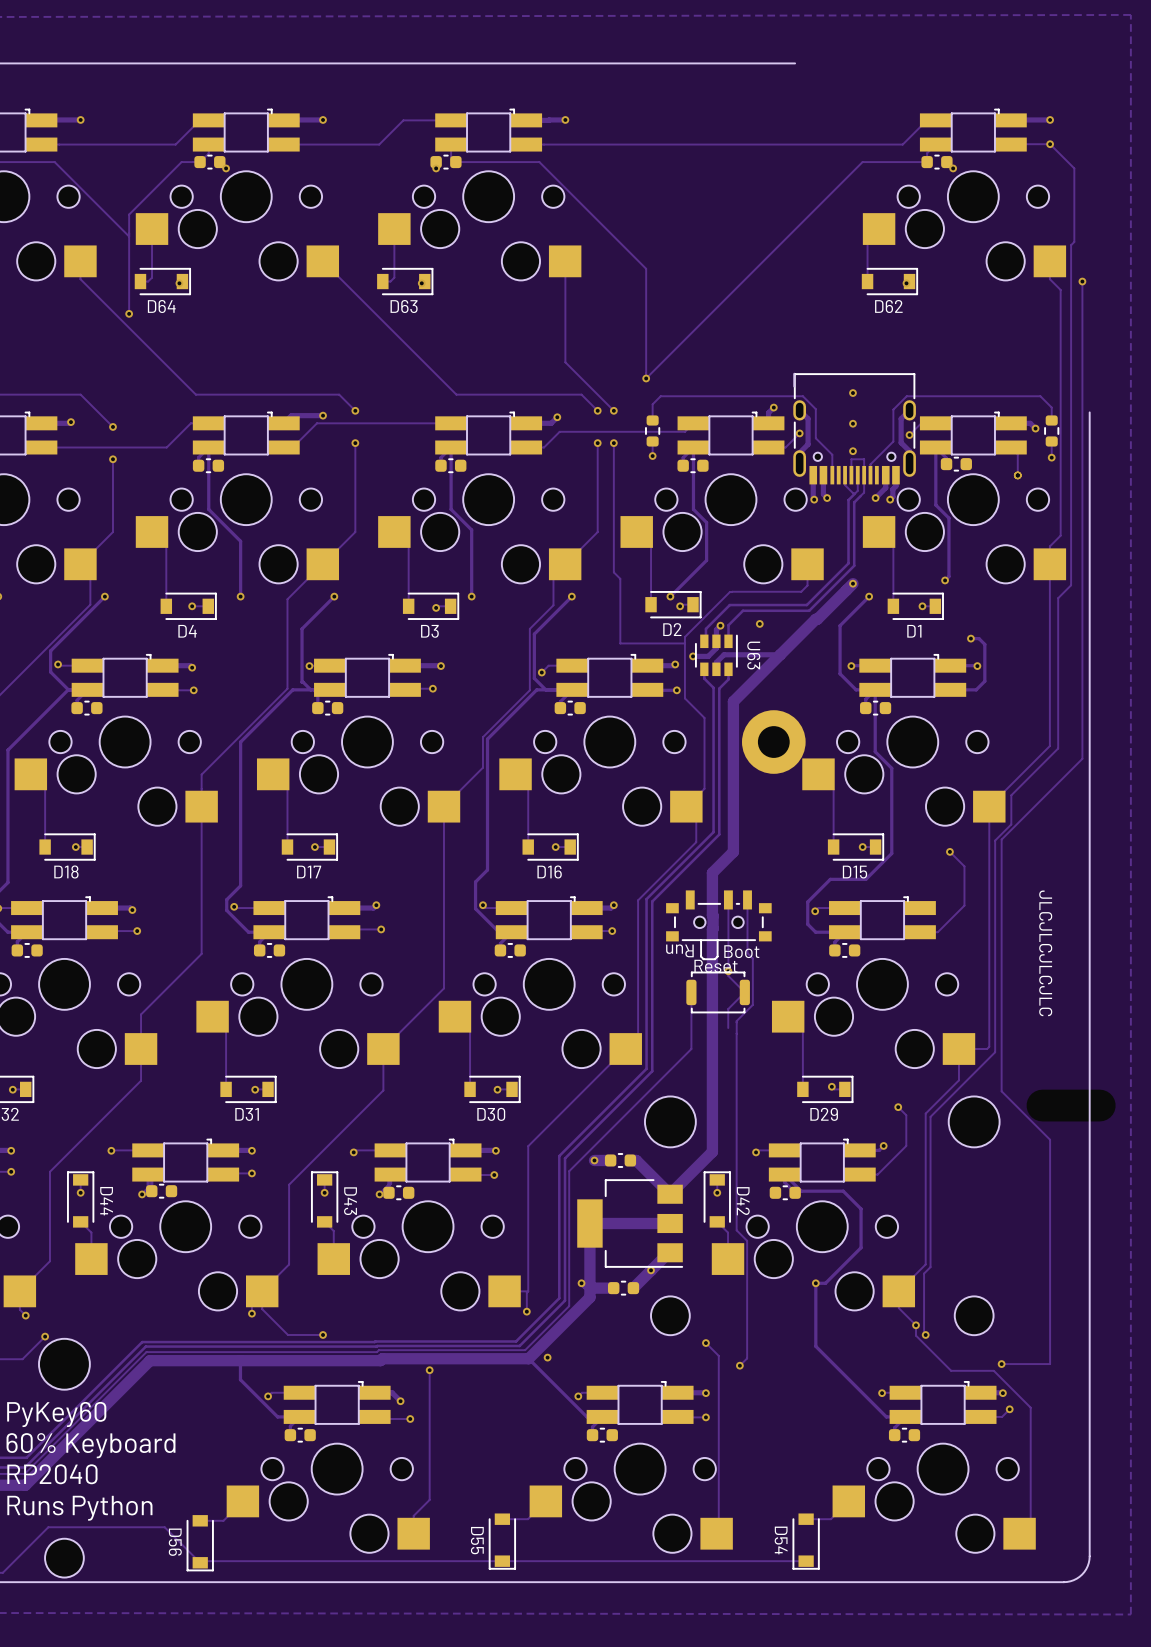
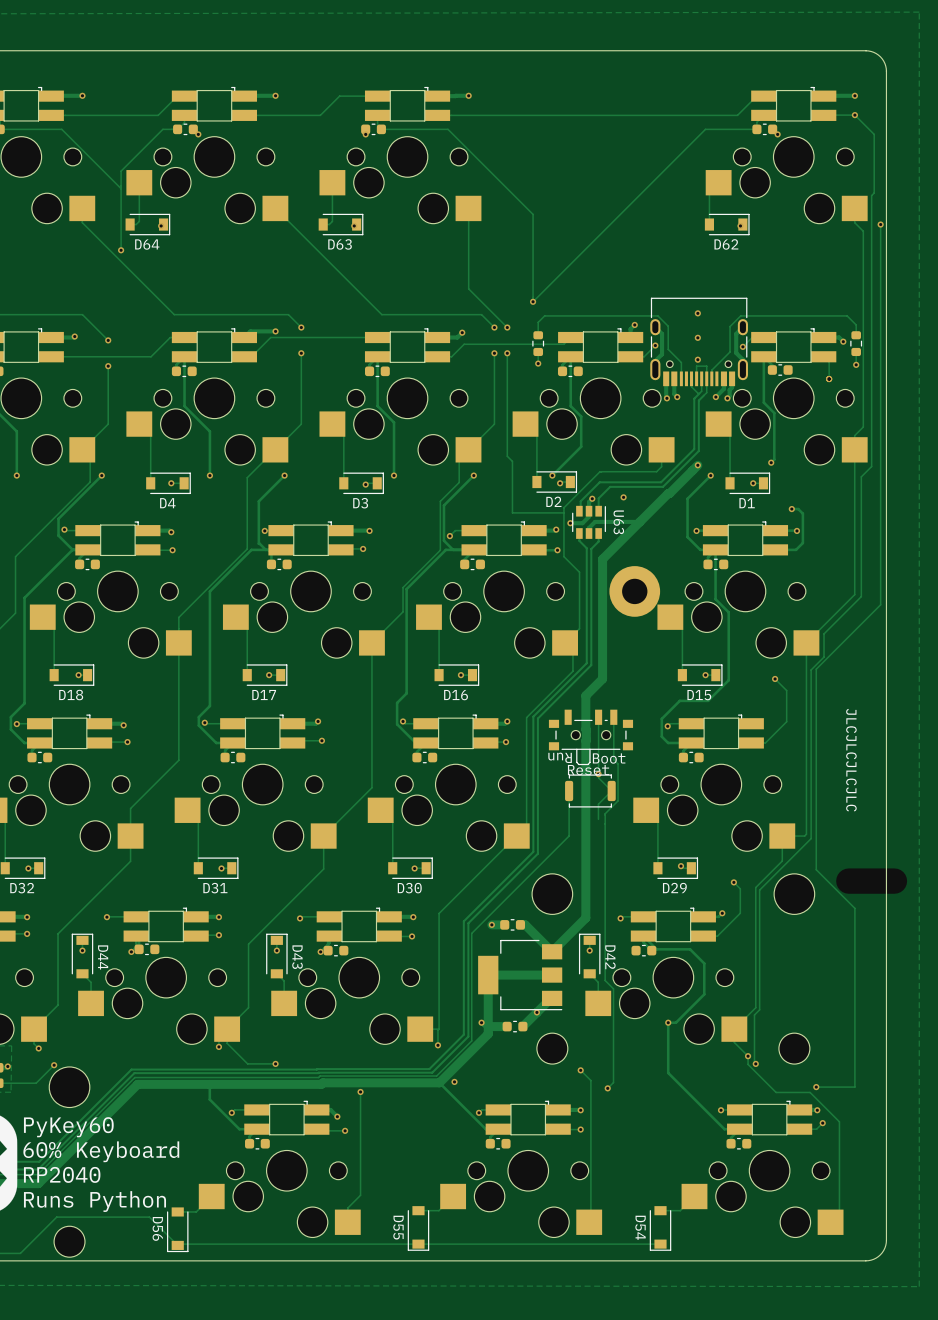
board edge: none -> (865, 50) (873, 52) (880, 56) (884, 63) (886, 71)
board edge: none -> (866, 50) (651, 50)
board edge: none -> (886, 71) (886, 328)
board edge: (794, 373) (794, 386) -> none

